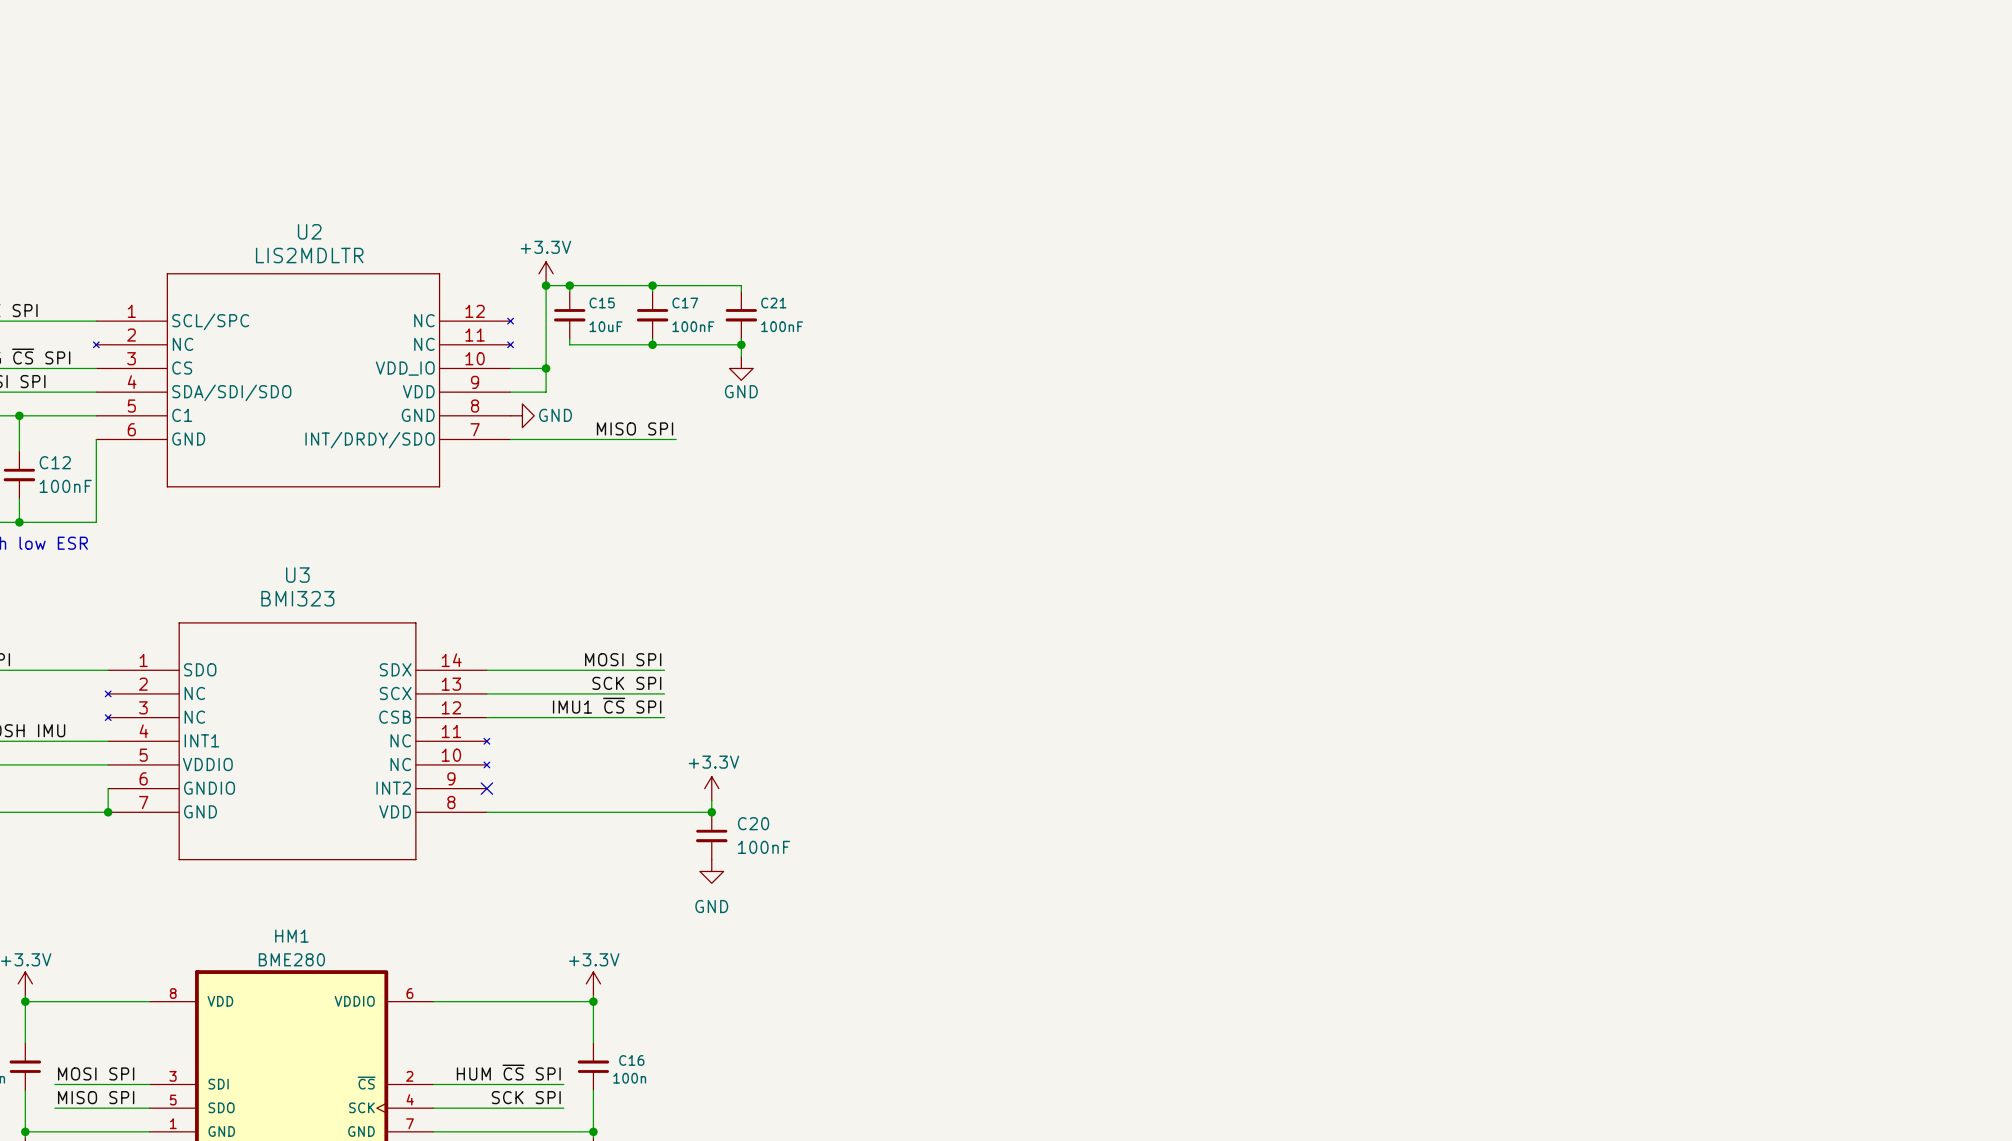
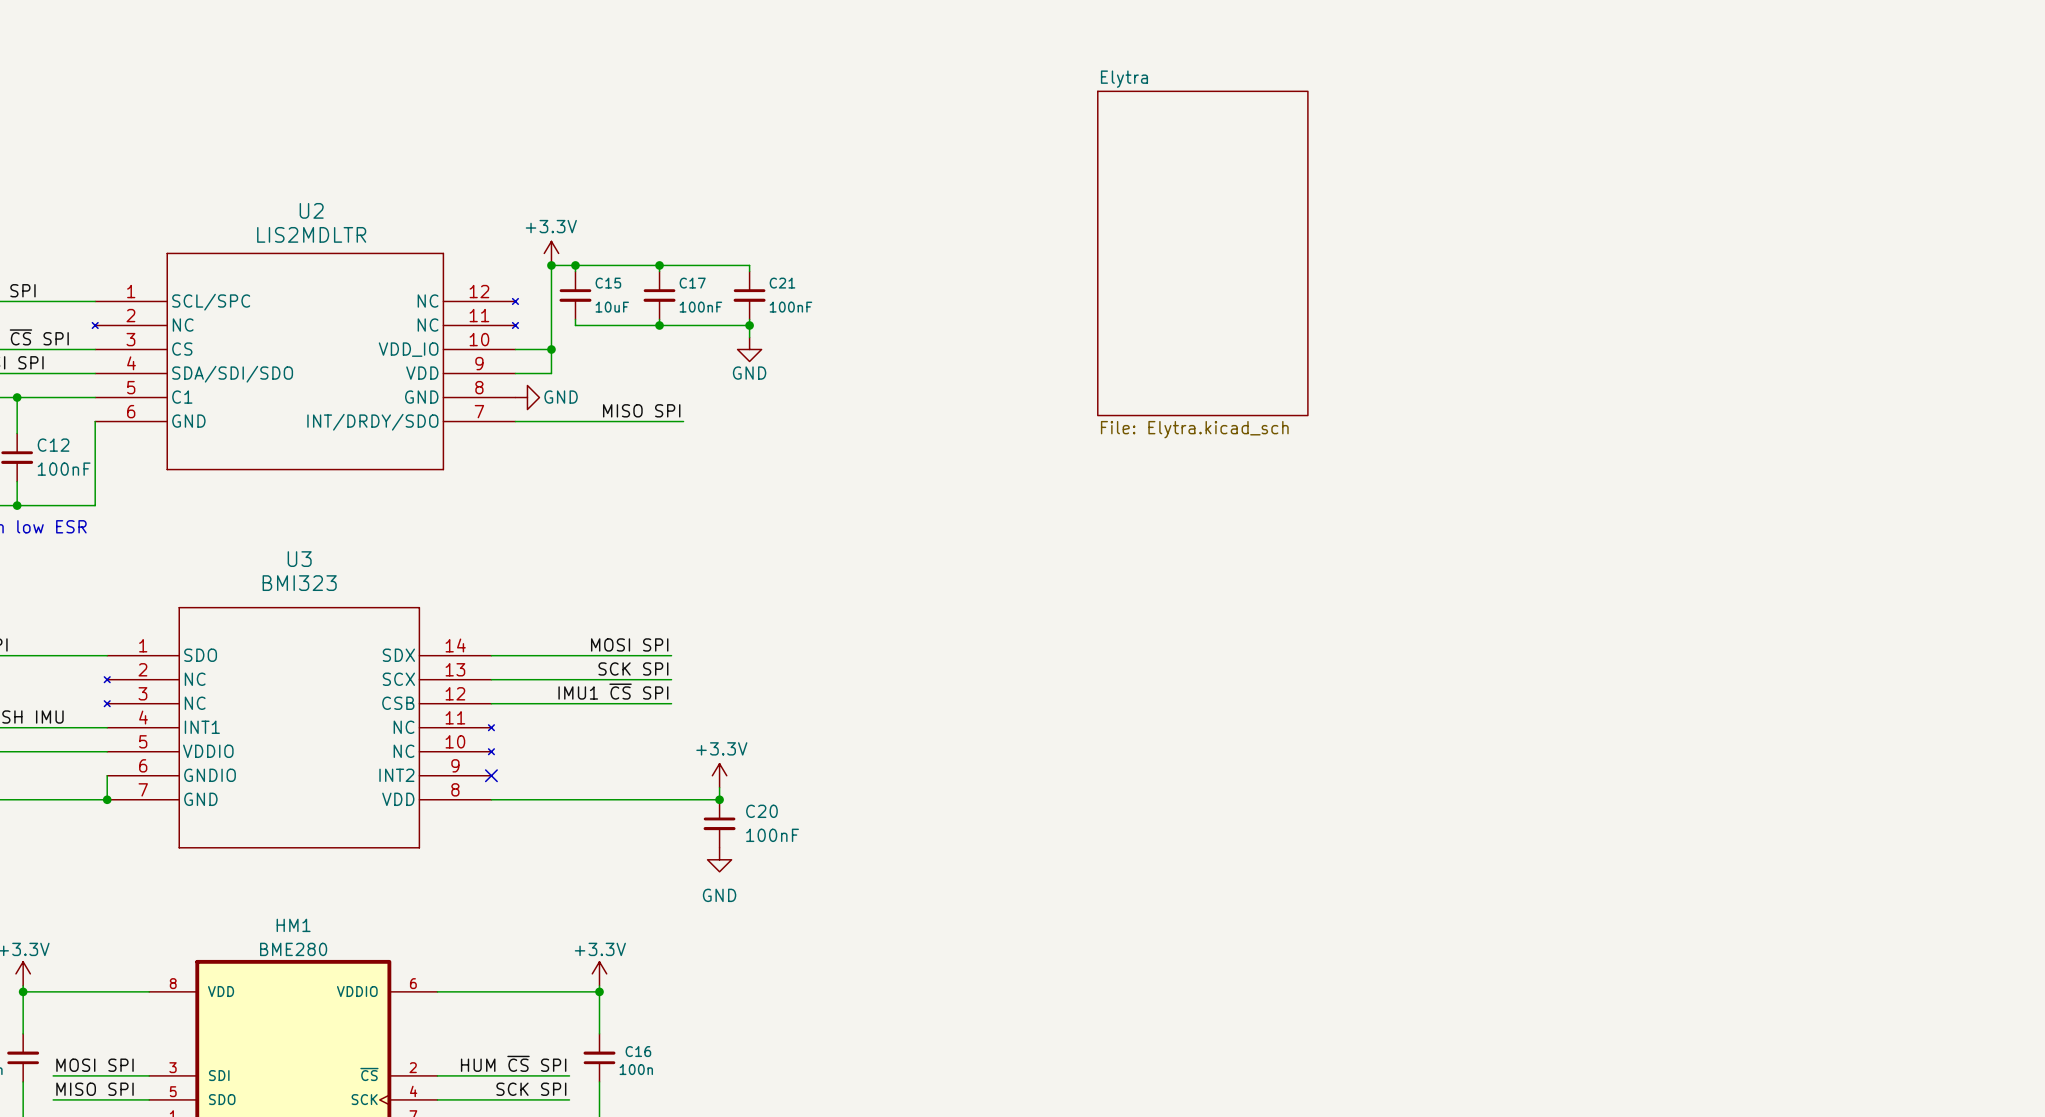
sheet Elytra: none -> File: Elytra.kicad_sch (1202, 253)

